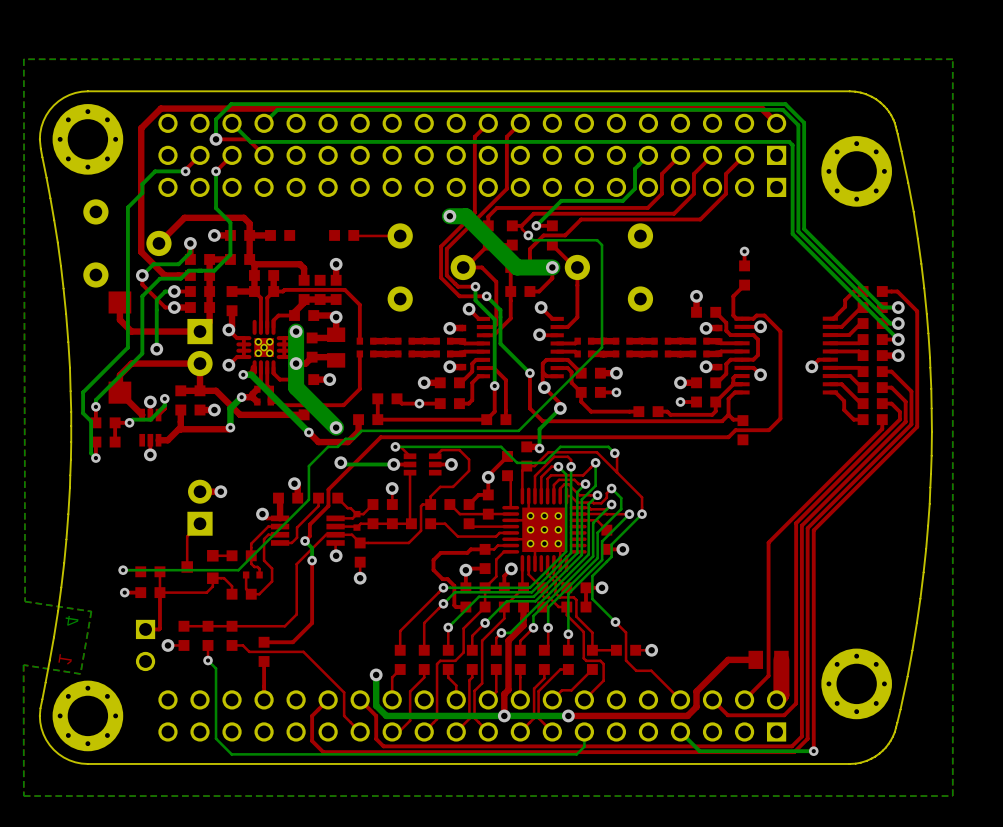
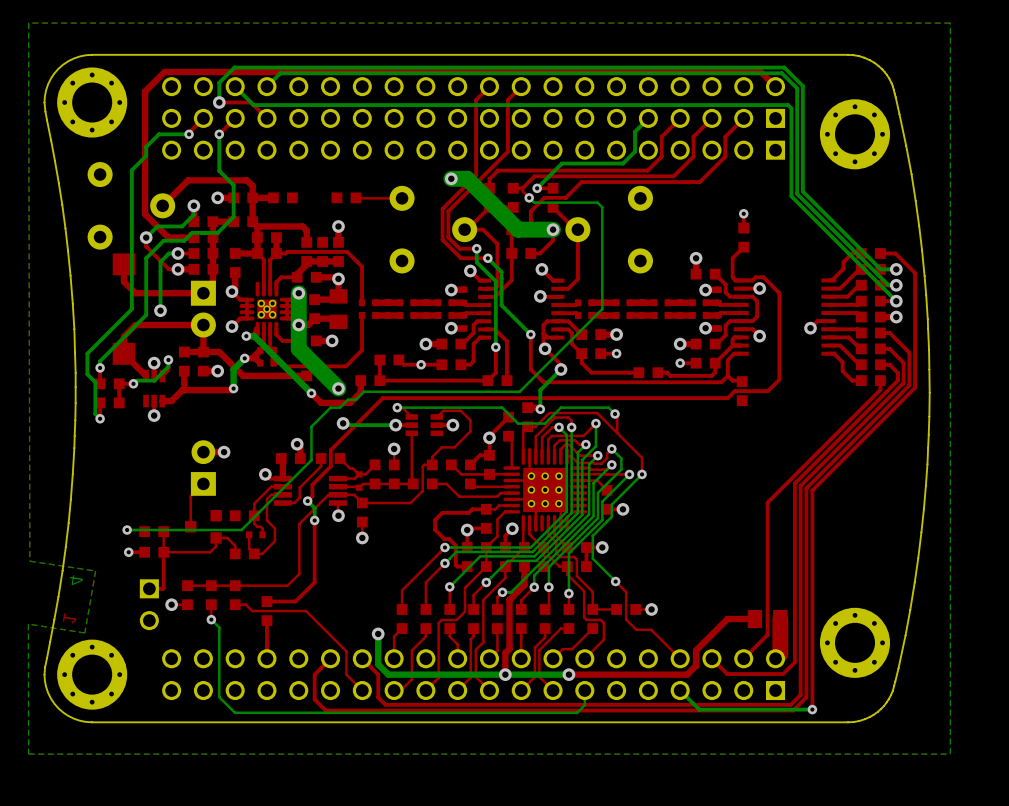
top track: (232, 555) (212, 555) -> none

